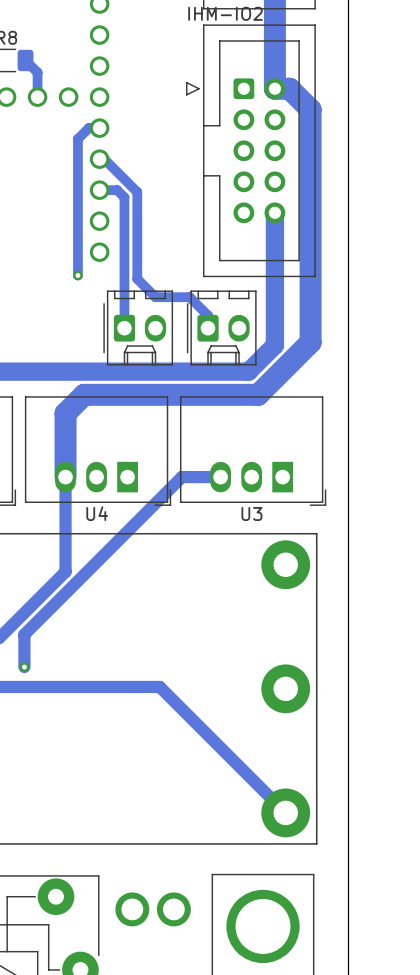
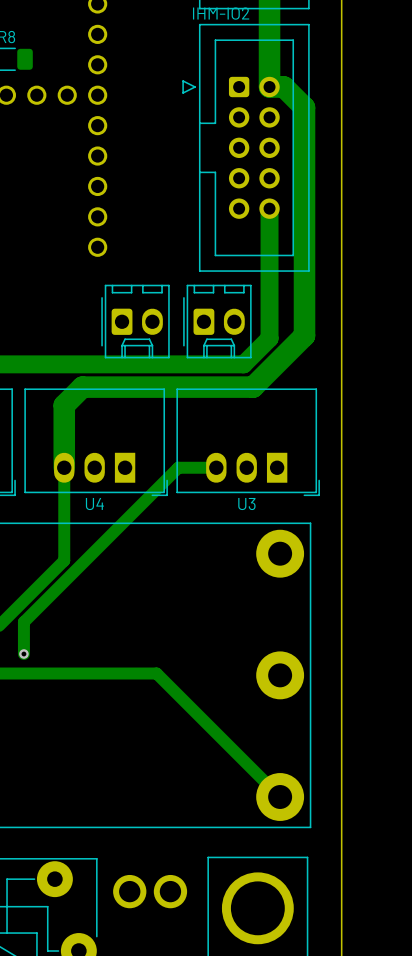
track: (25, 60) (37, 72) (37, 97) -> none
track: (99, 128) (88, 128) (77, 138) (77, 275) -> none
track: (99, 159) (104, 159) (137, 192) (137, 278) (155, 297) (189, 297) (208, 315) (208, 328) -> none
track: (99, 190) (117, 190) (124, 197) (124, 328) -> none
via: (77, 275) -> none

